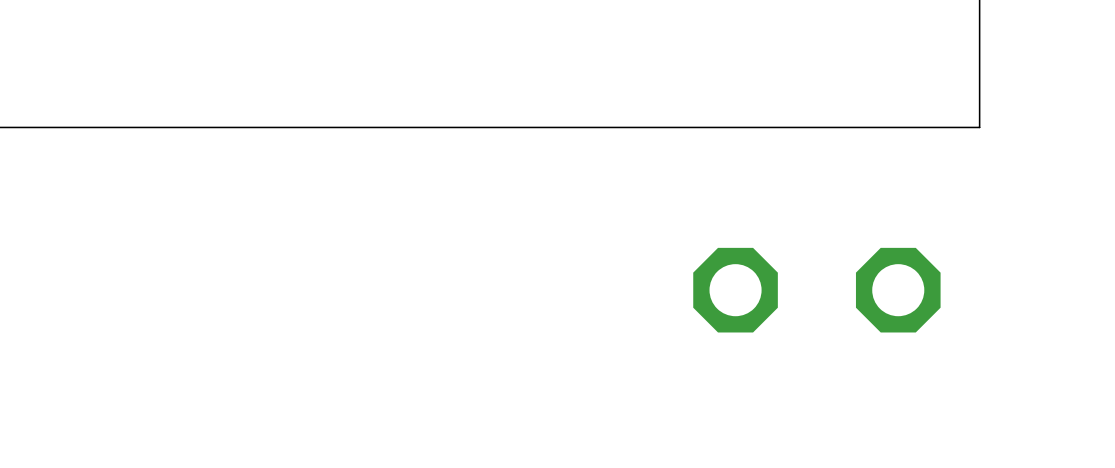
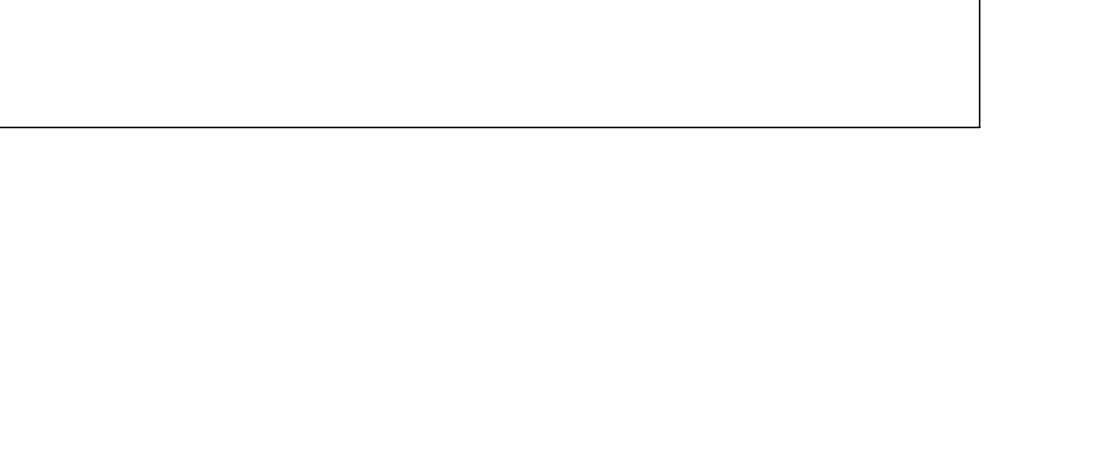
part: (816, 290) -> none

